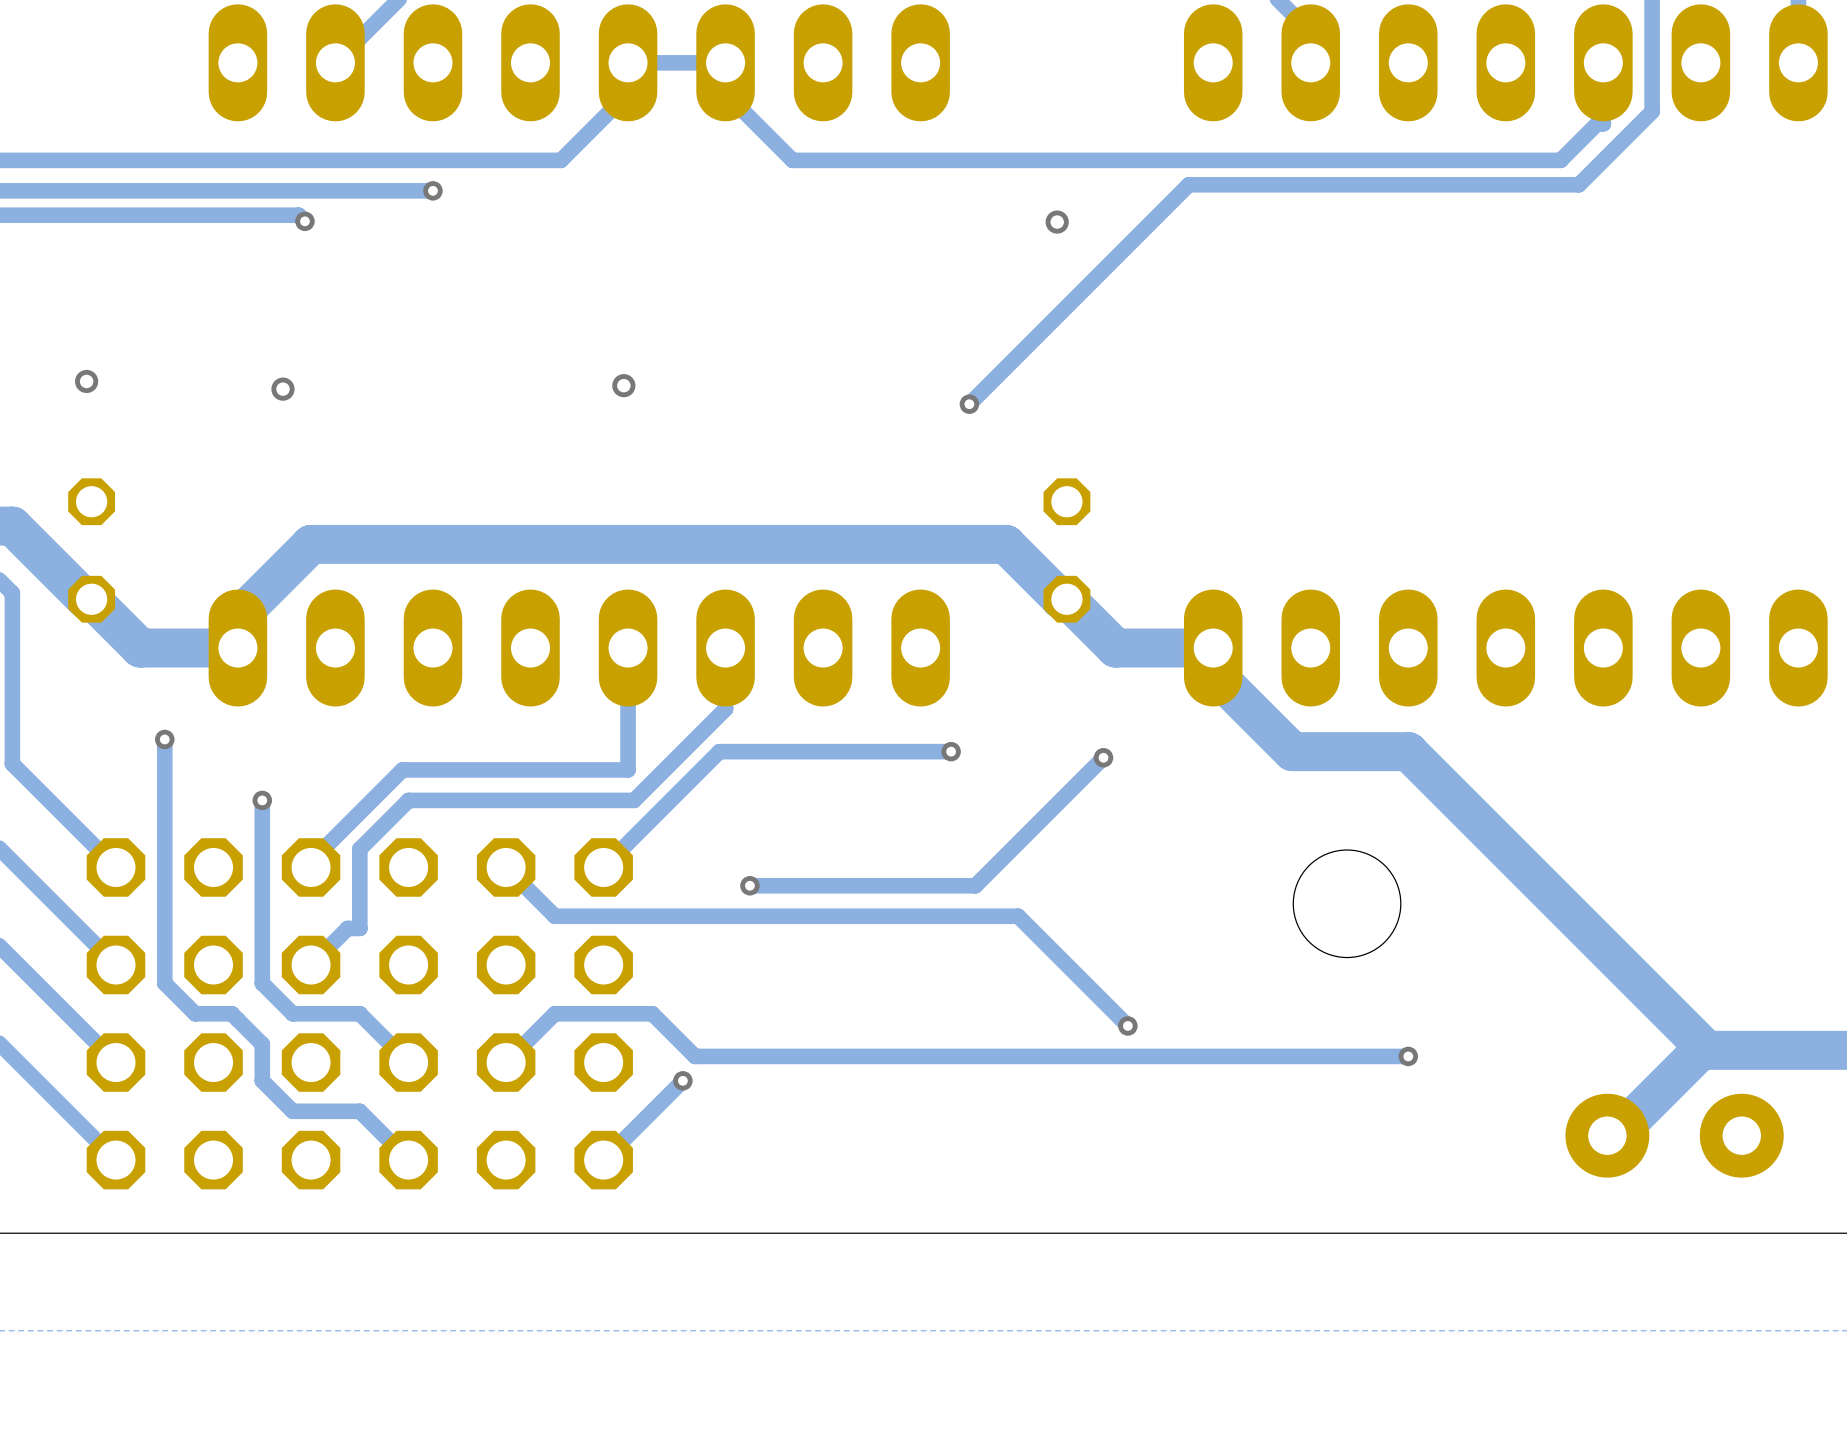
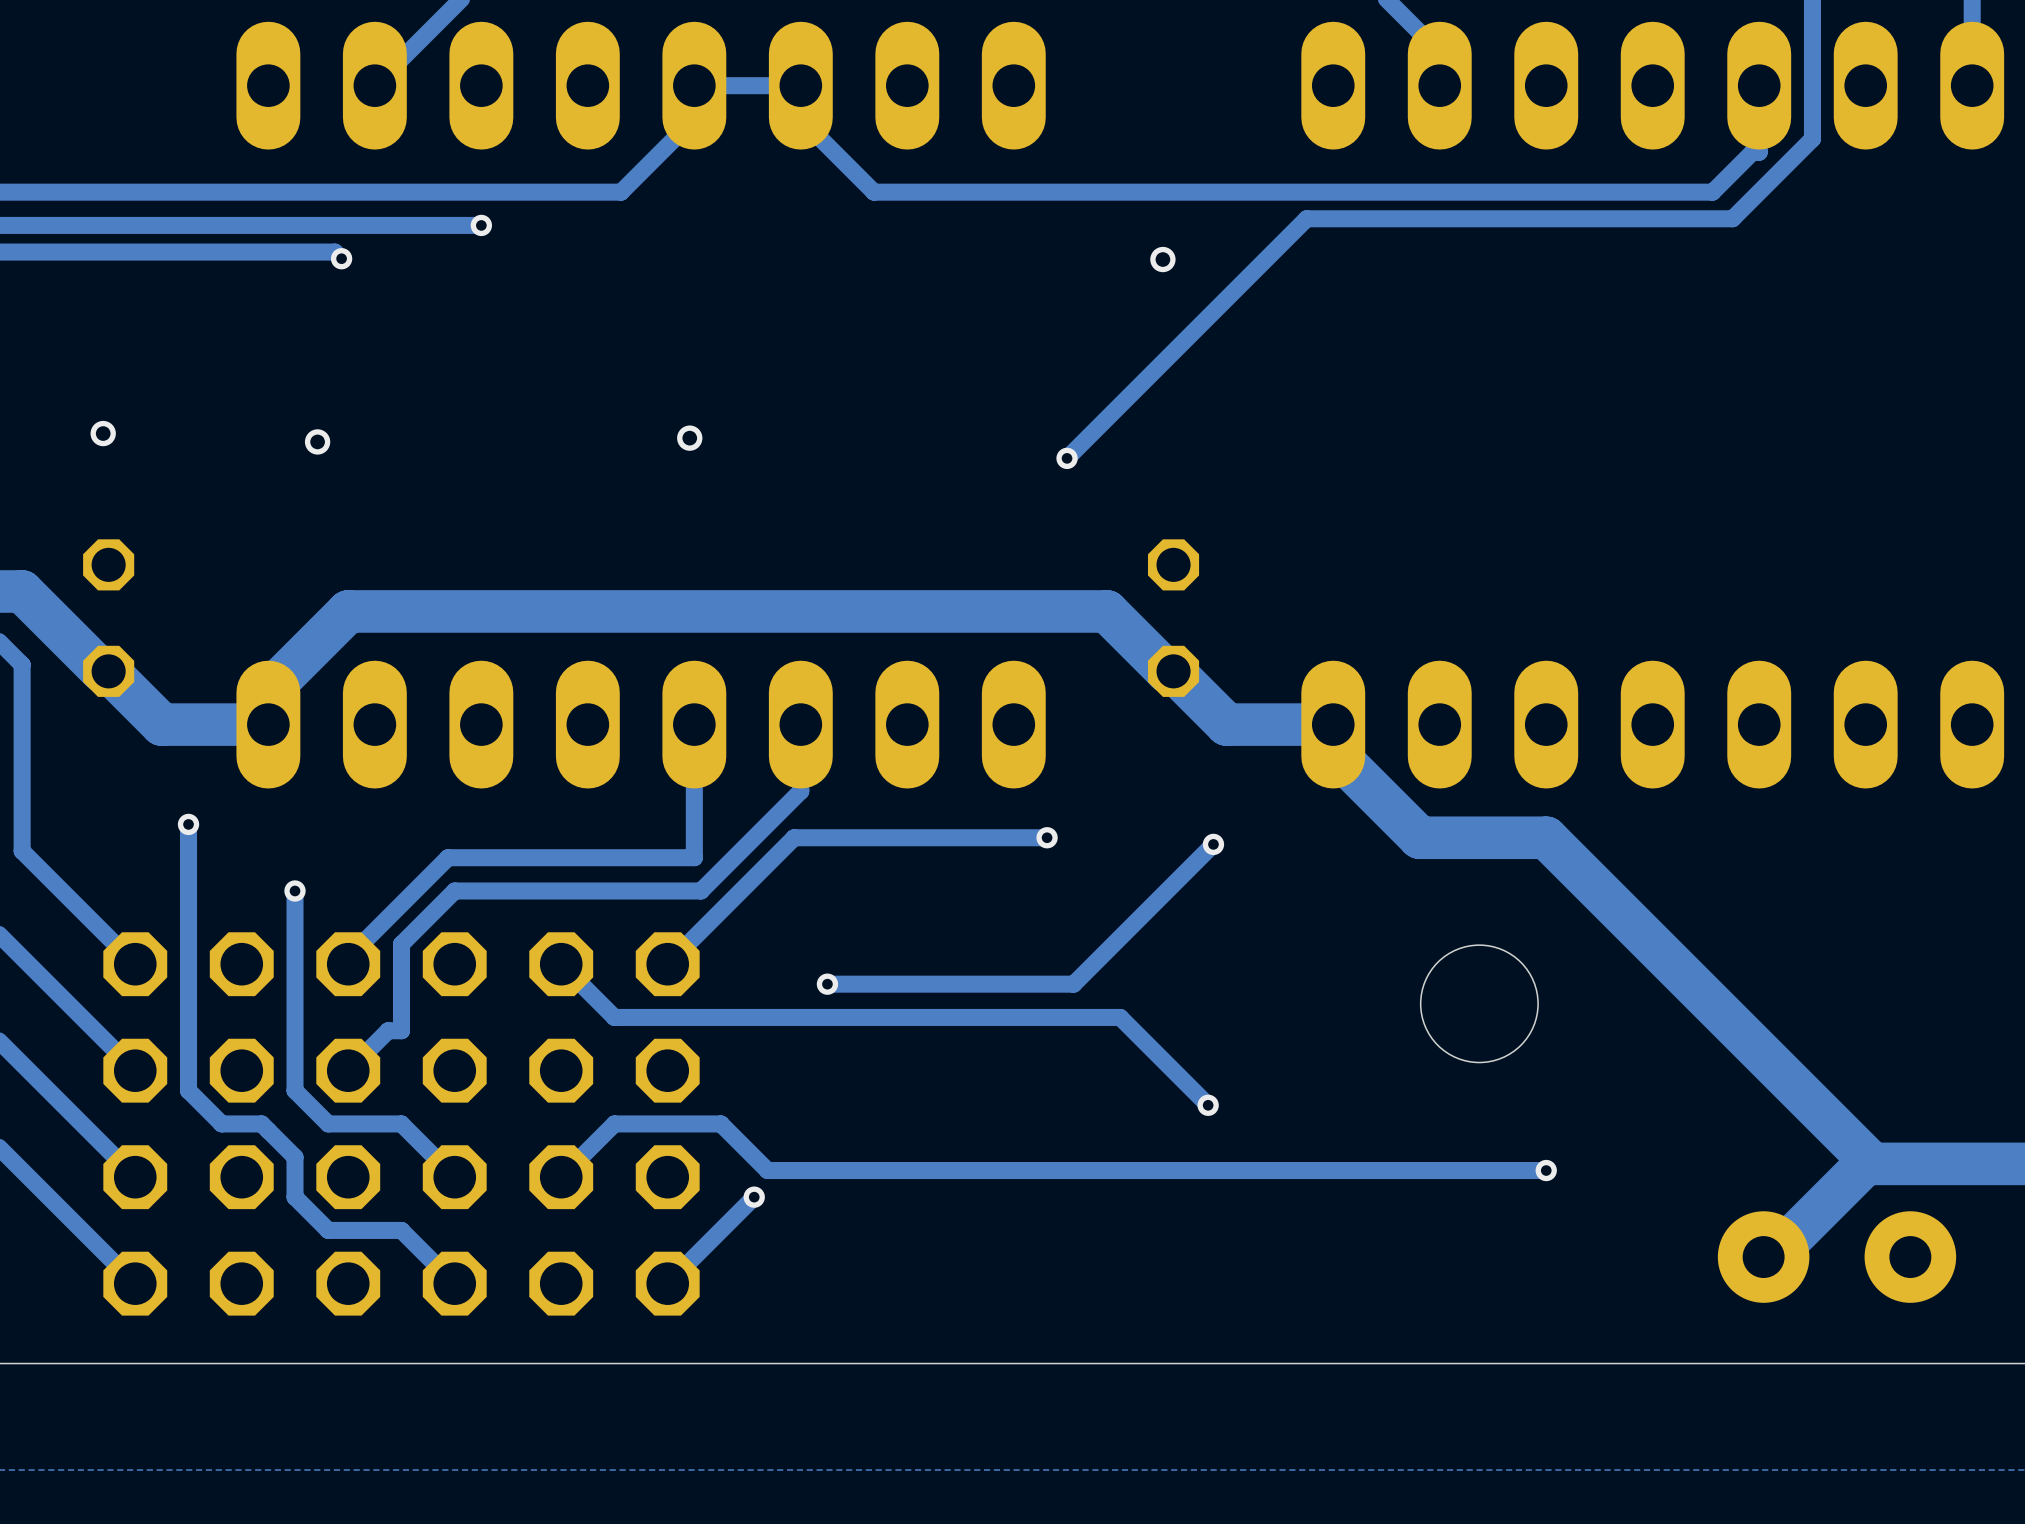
track: (1098, 996) (1127, 1025) -> none
via position: (1127, 1025) -> (1208, 1105)

